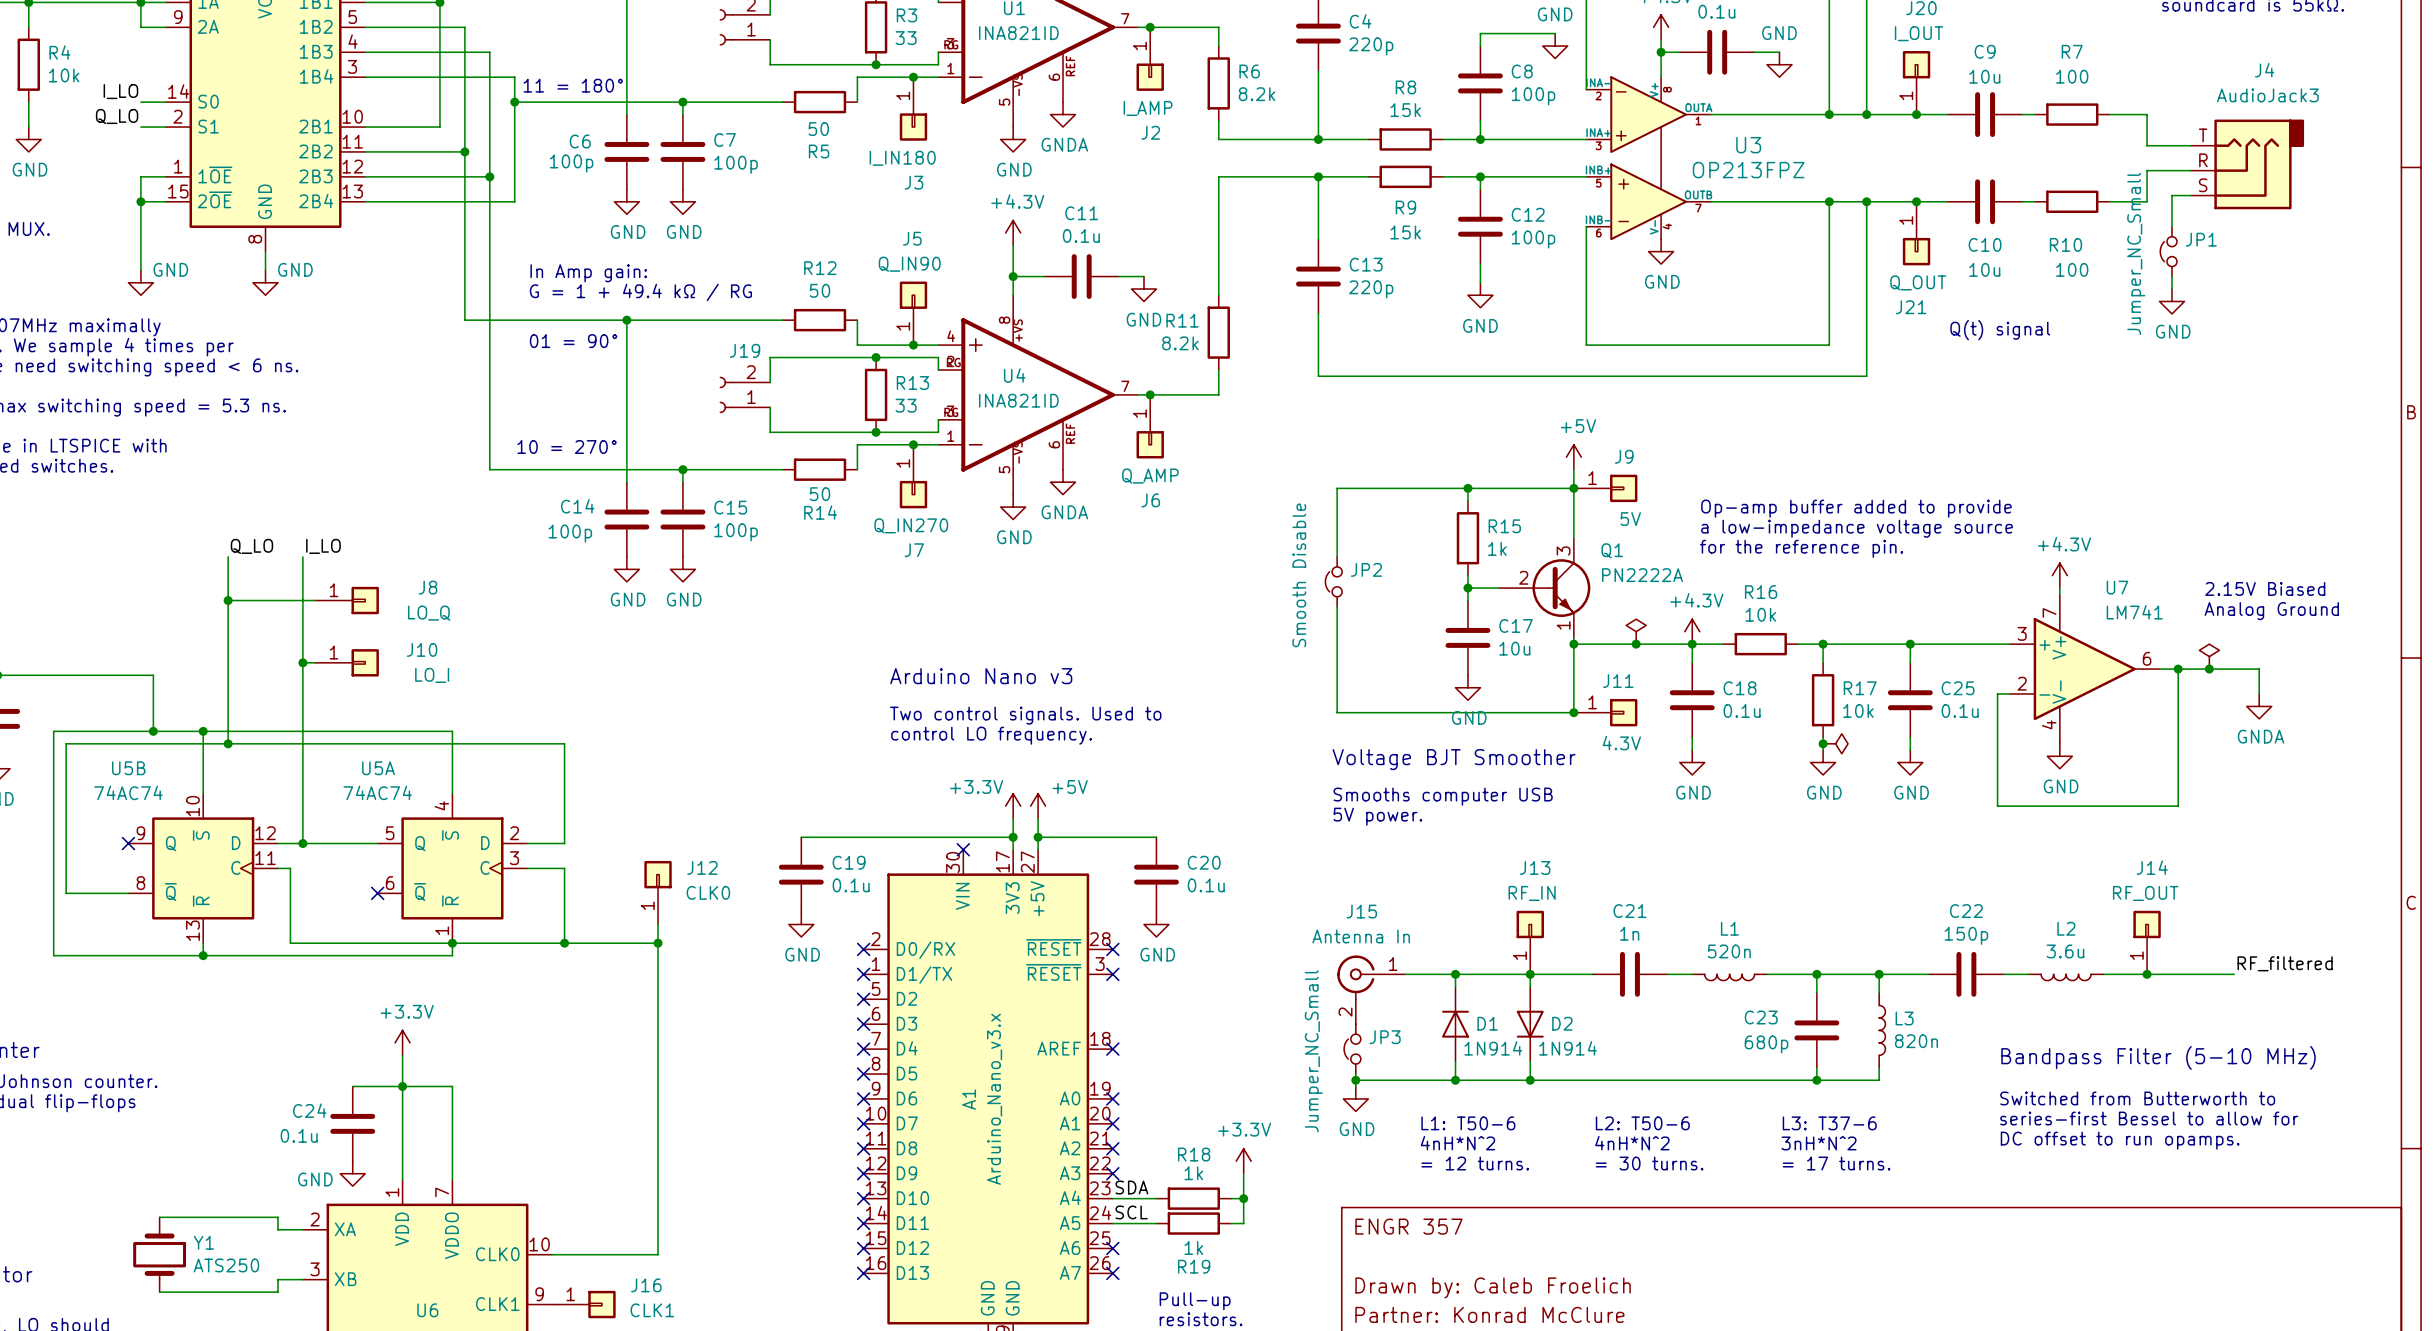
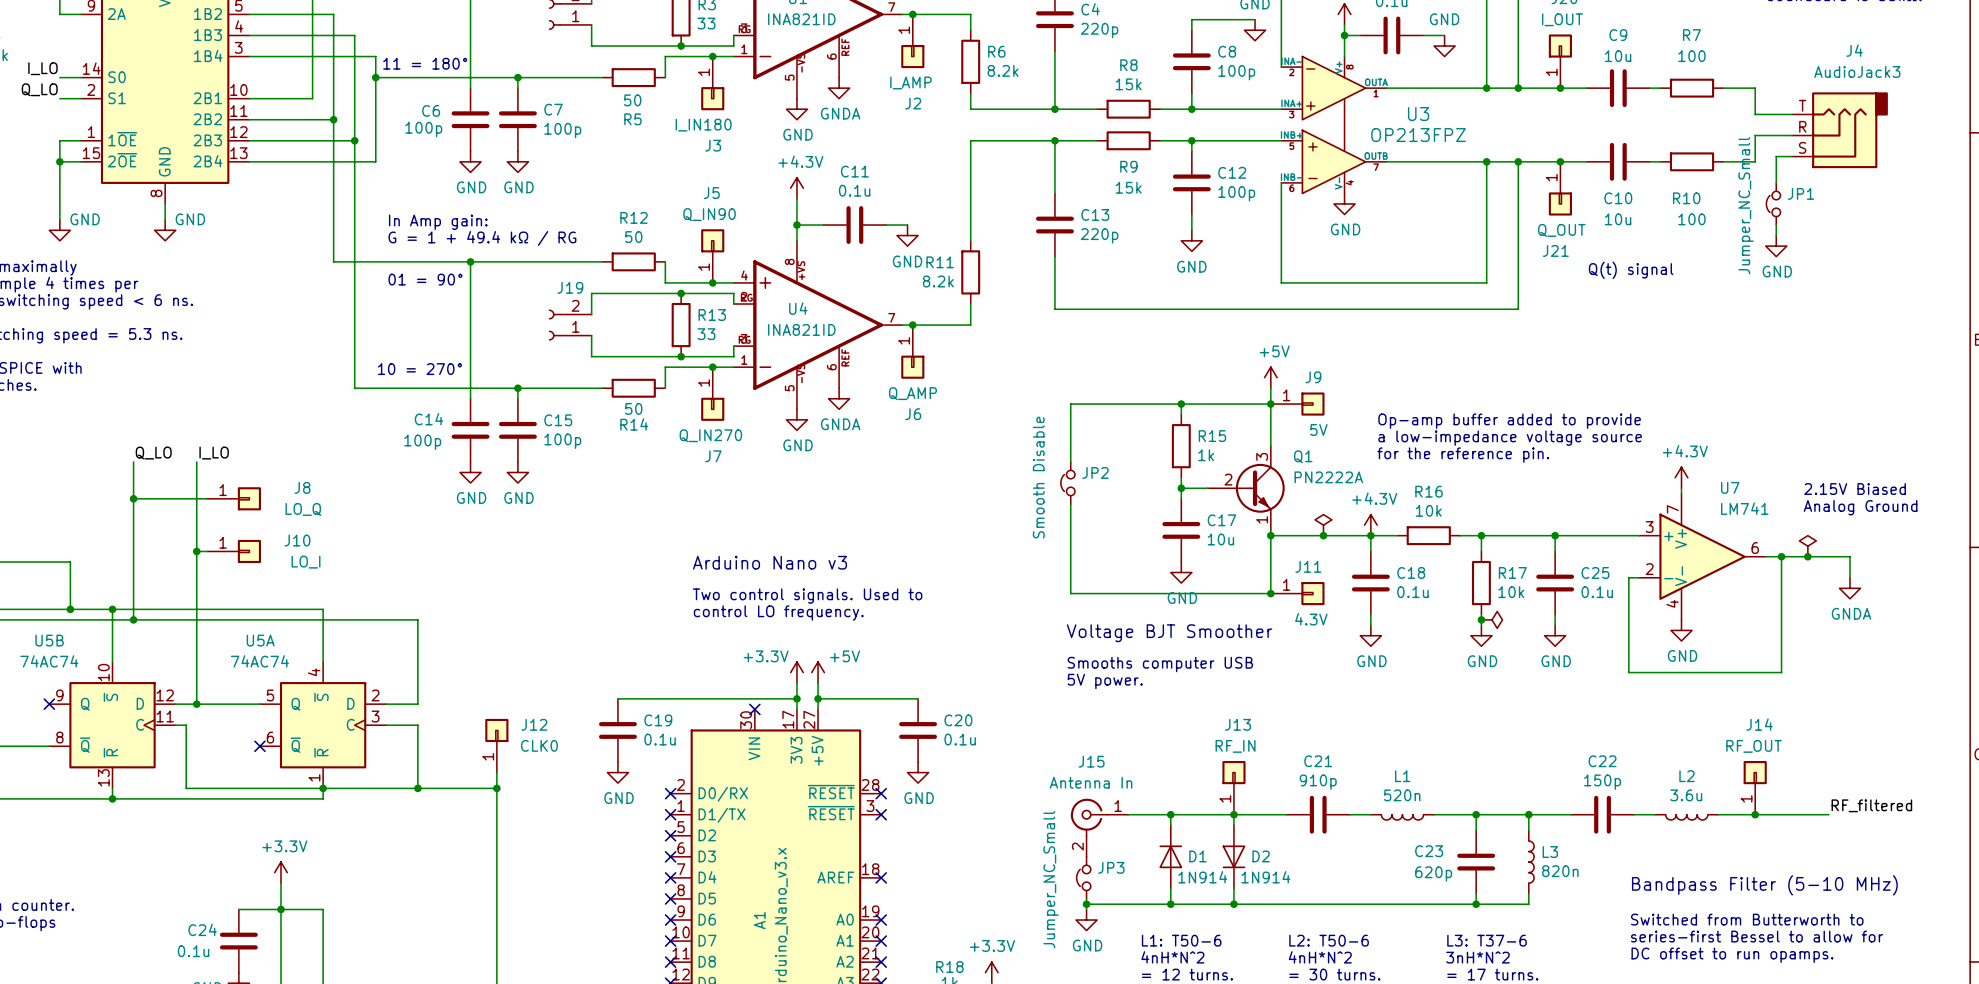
C21 value: 1n (1629, 933) -> 910p (1318, 782)
C23 value: 680p (1766, 1044) -> 620p (1433, 873)

